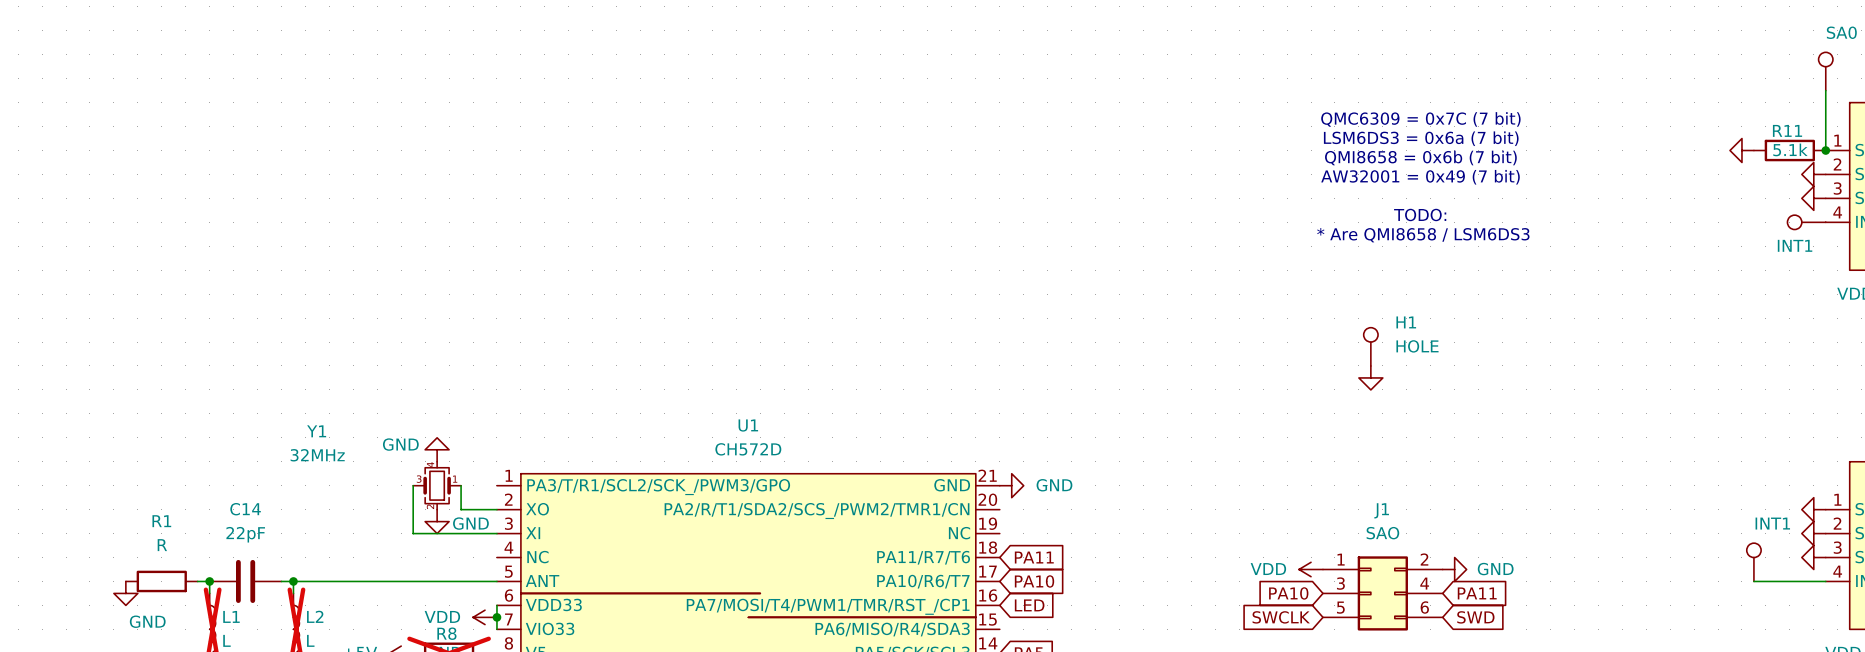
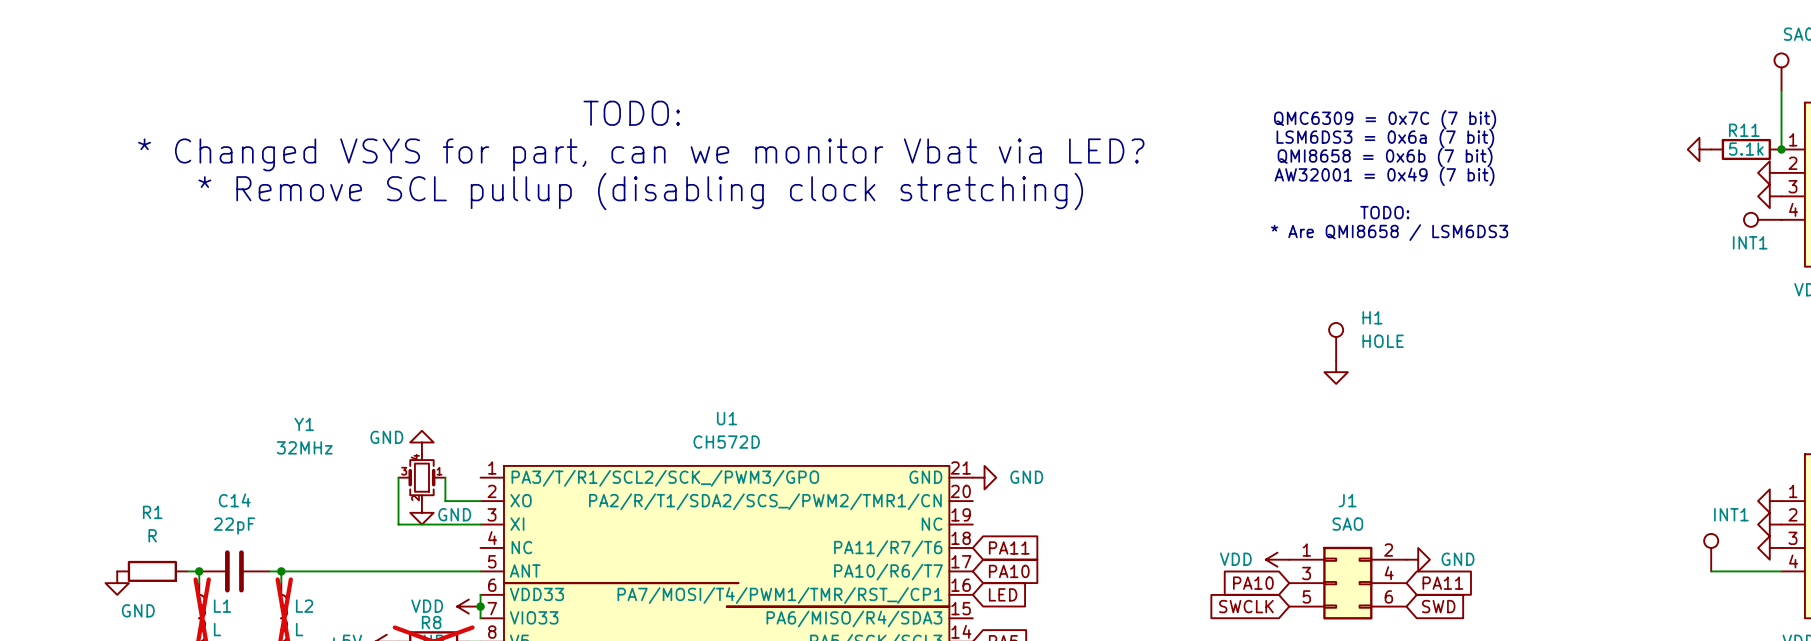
text: none -> TODO: (631, 113)
text: none -> * Changed VSYS for part, can we monitor Vbat via LED? (641, 154)
text: none -> * Remove SCL pullup (disabling clock stretching) (640, 191)

